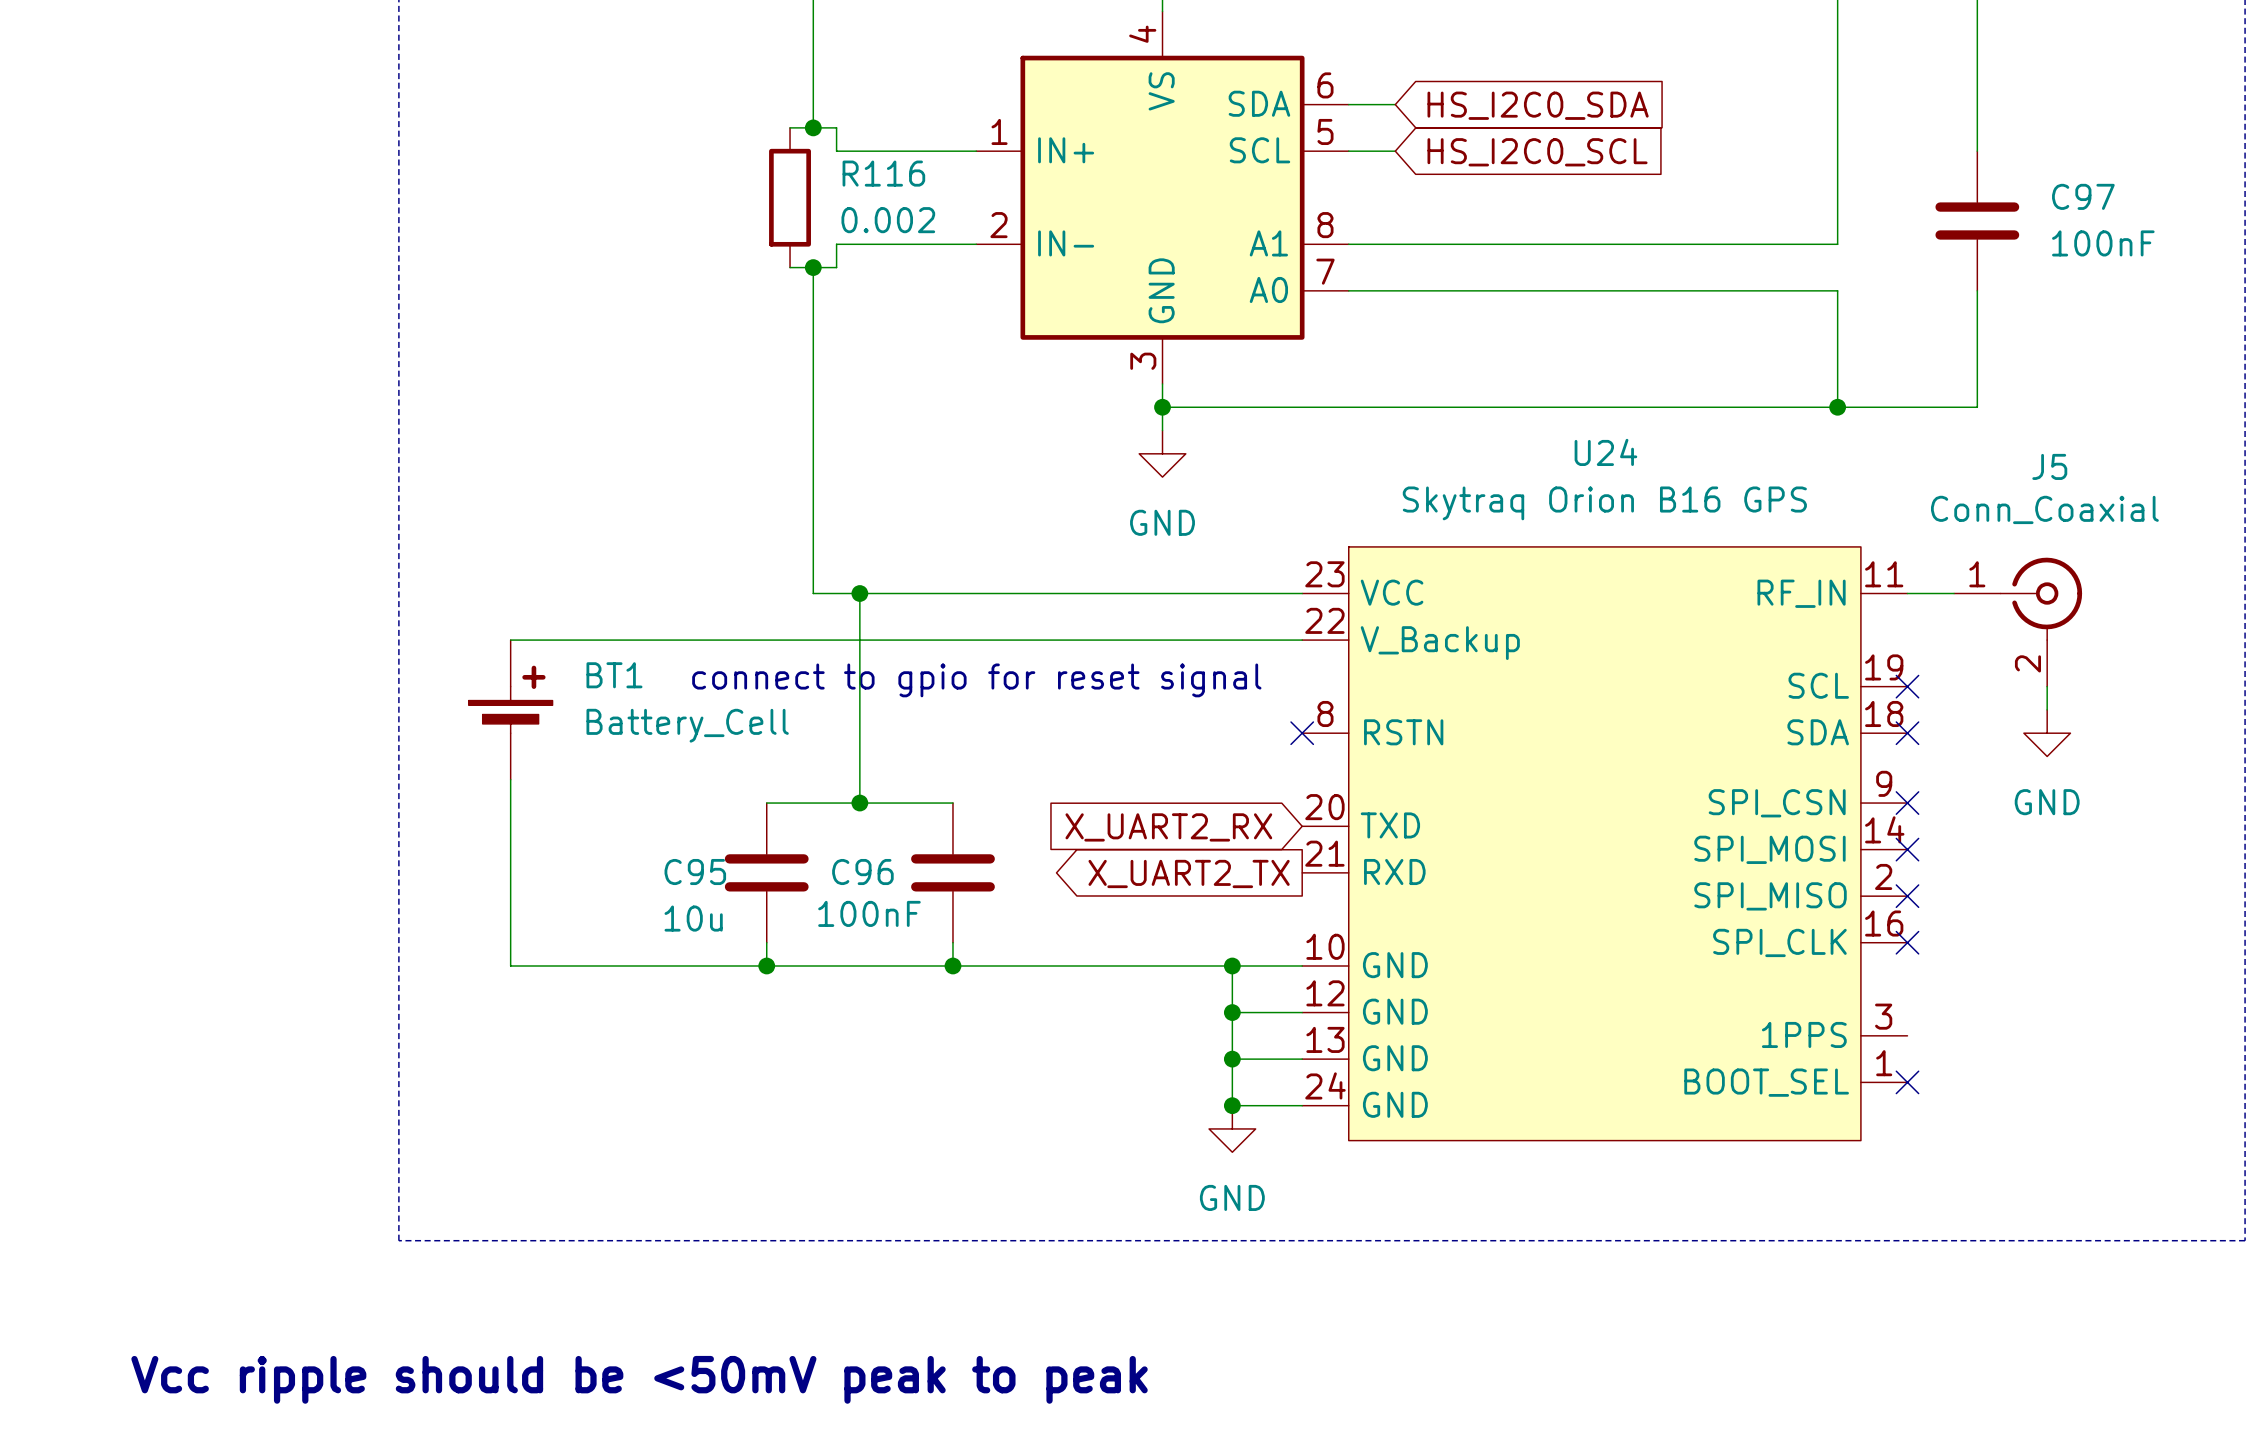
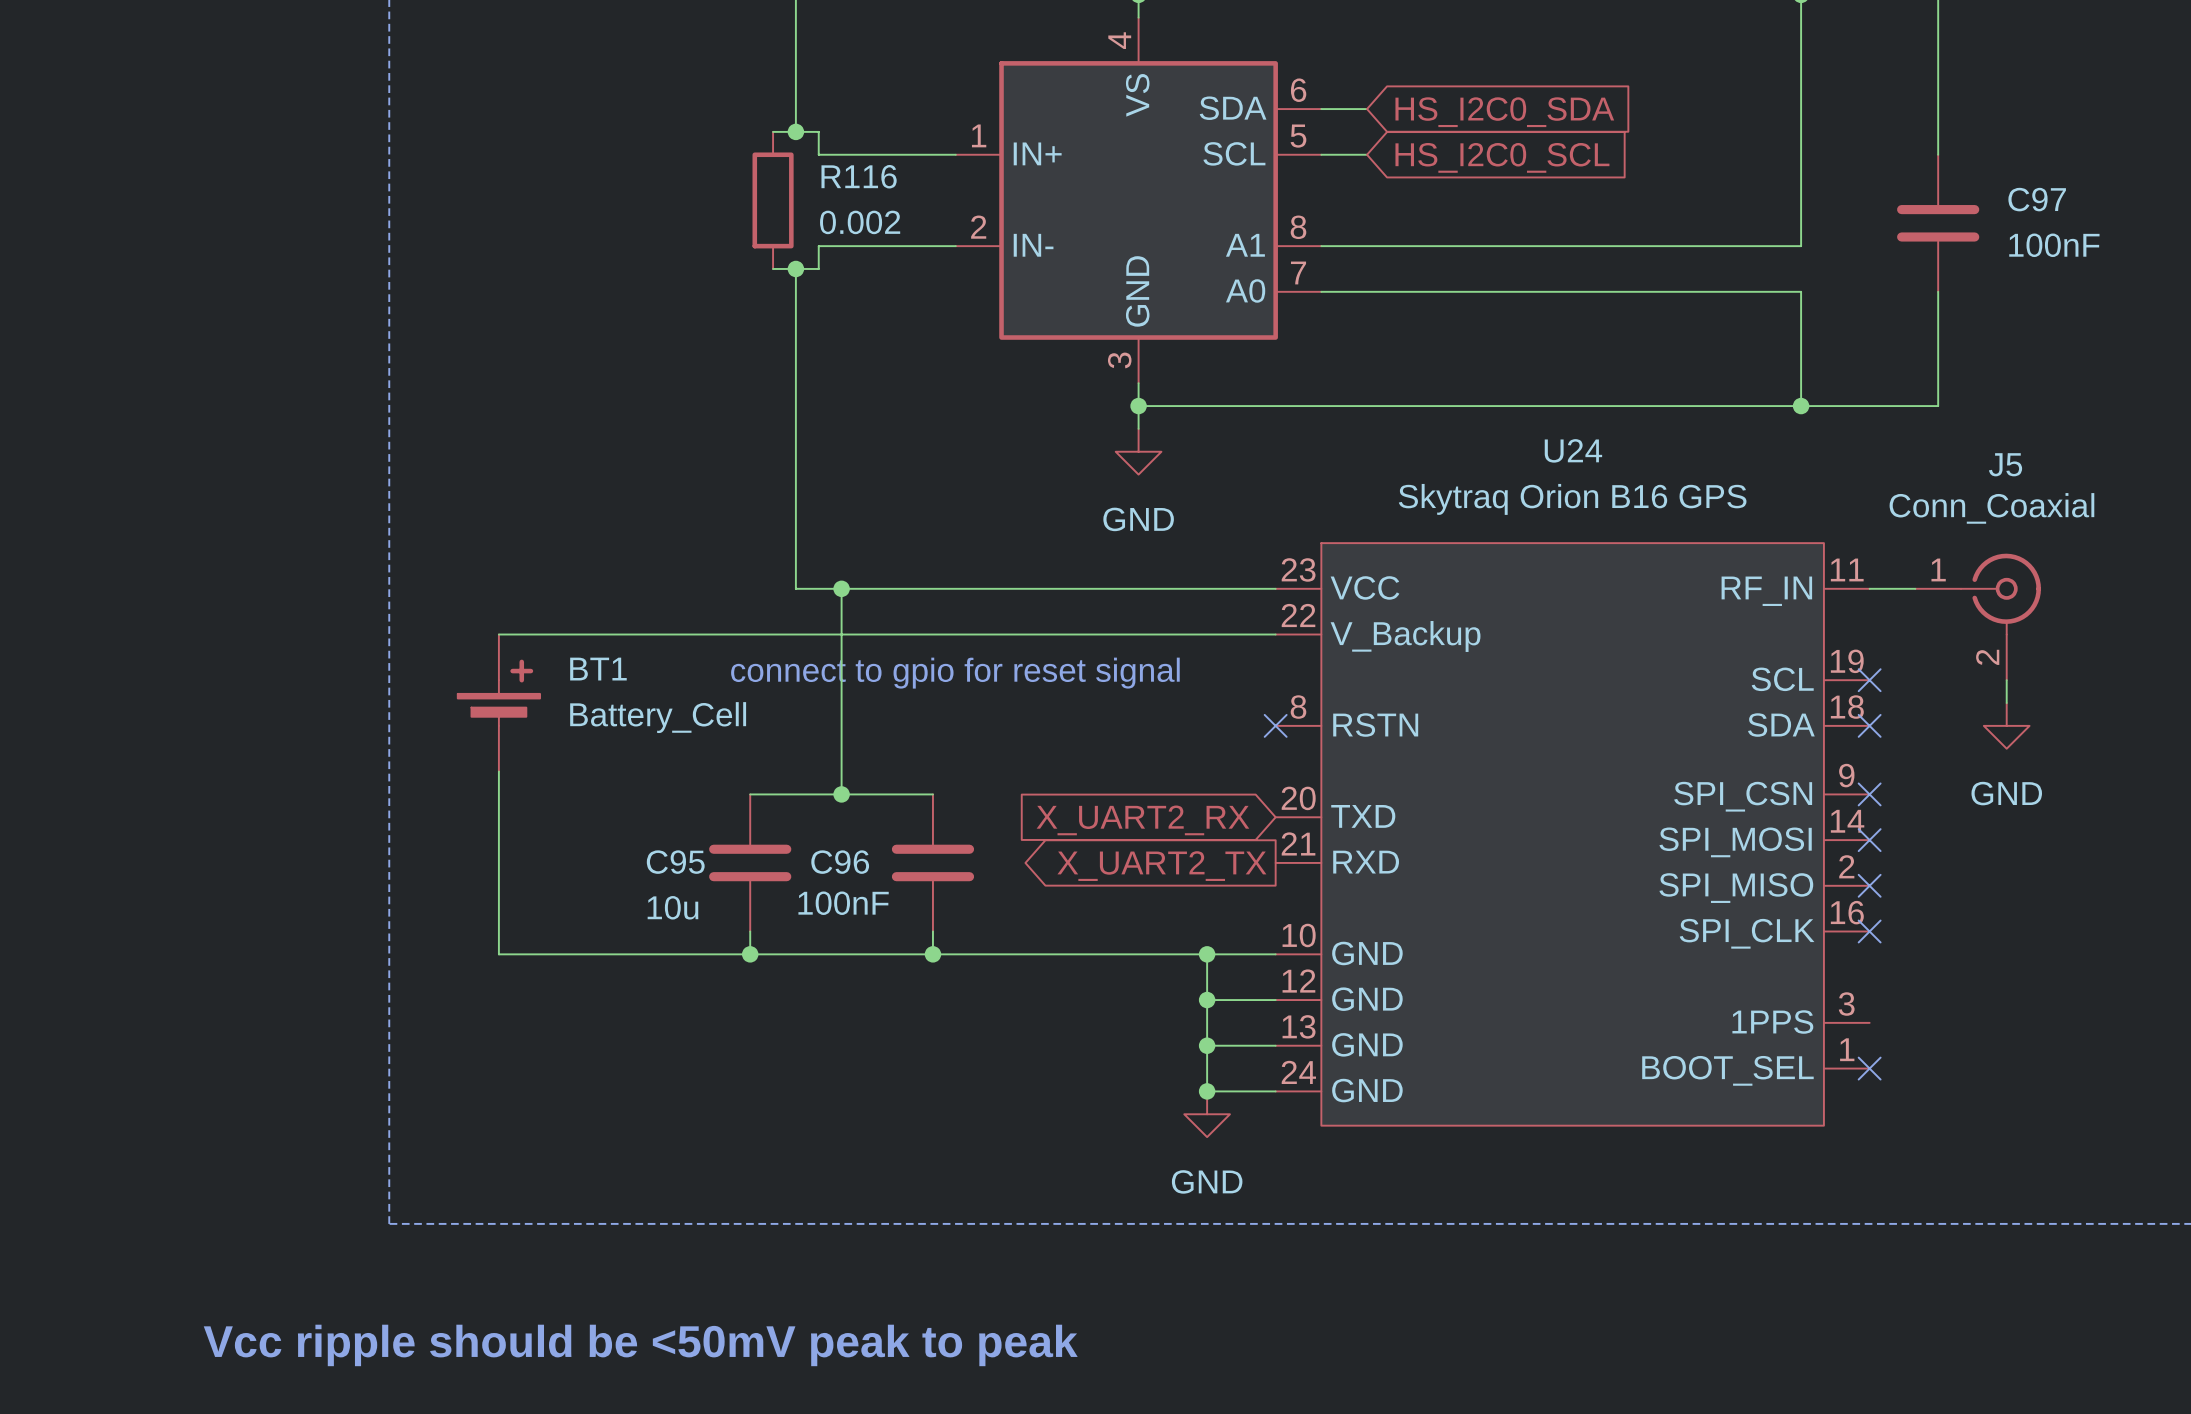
text position: Vcc ripple should be <50mV peak to peak (639, 1379) -> Vcc ripple should be <50mV peak to peak (640, 1345)

